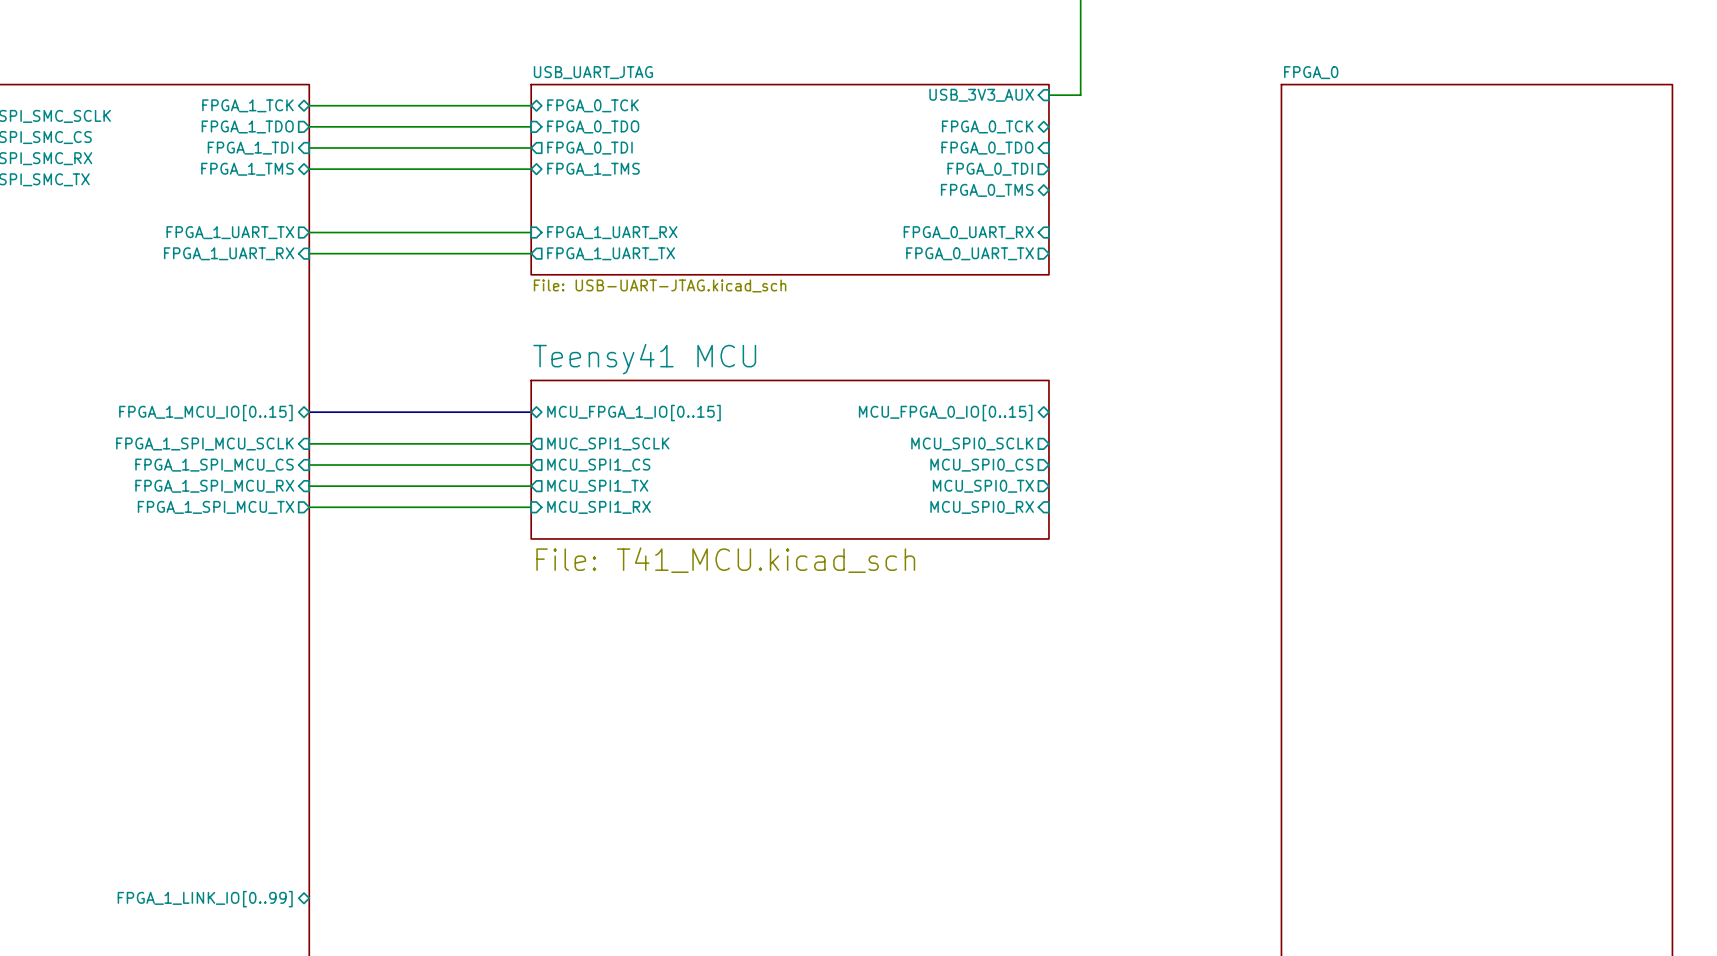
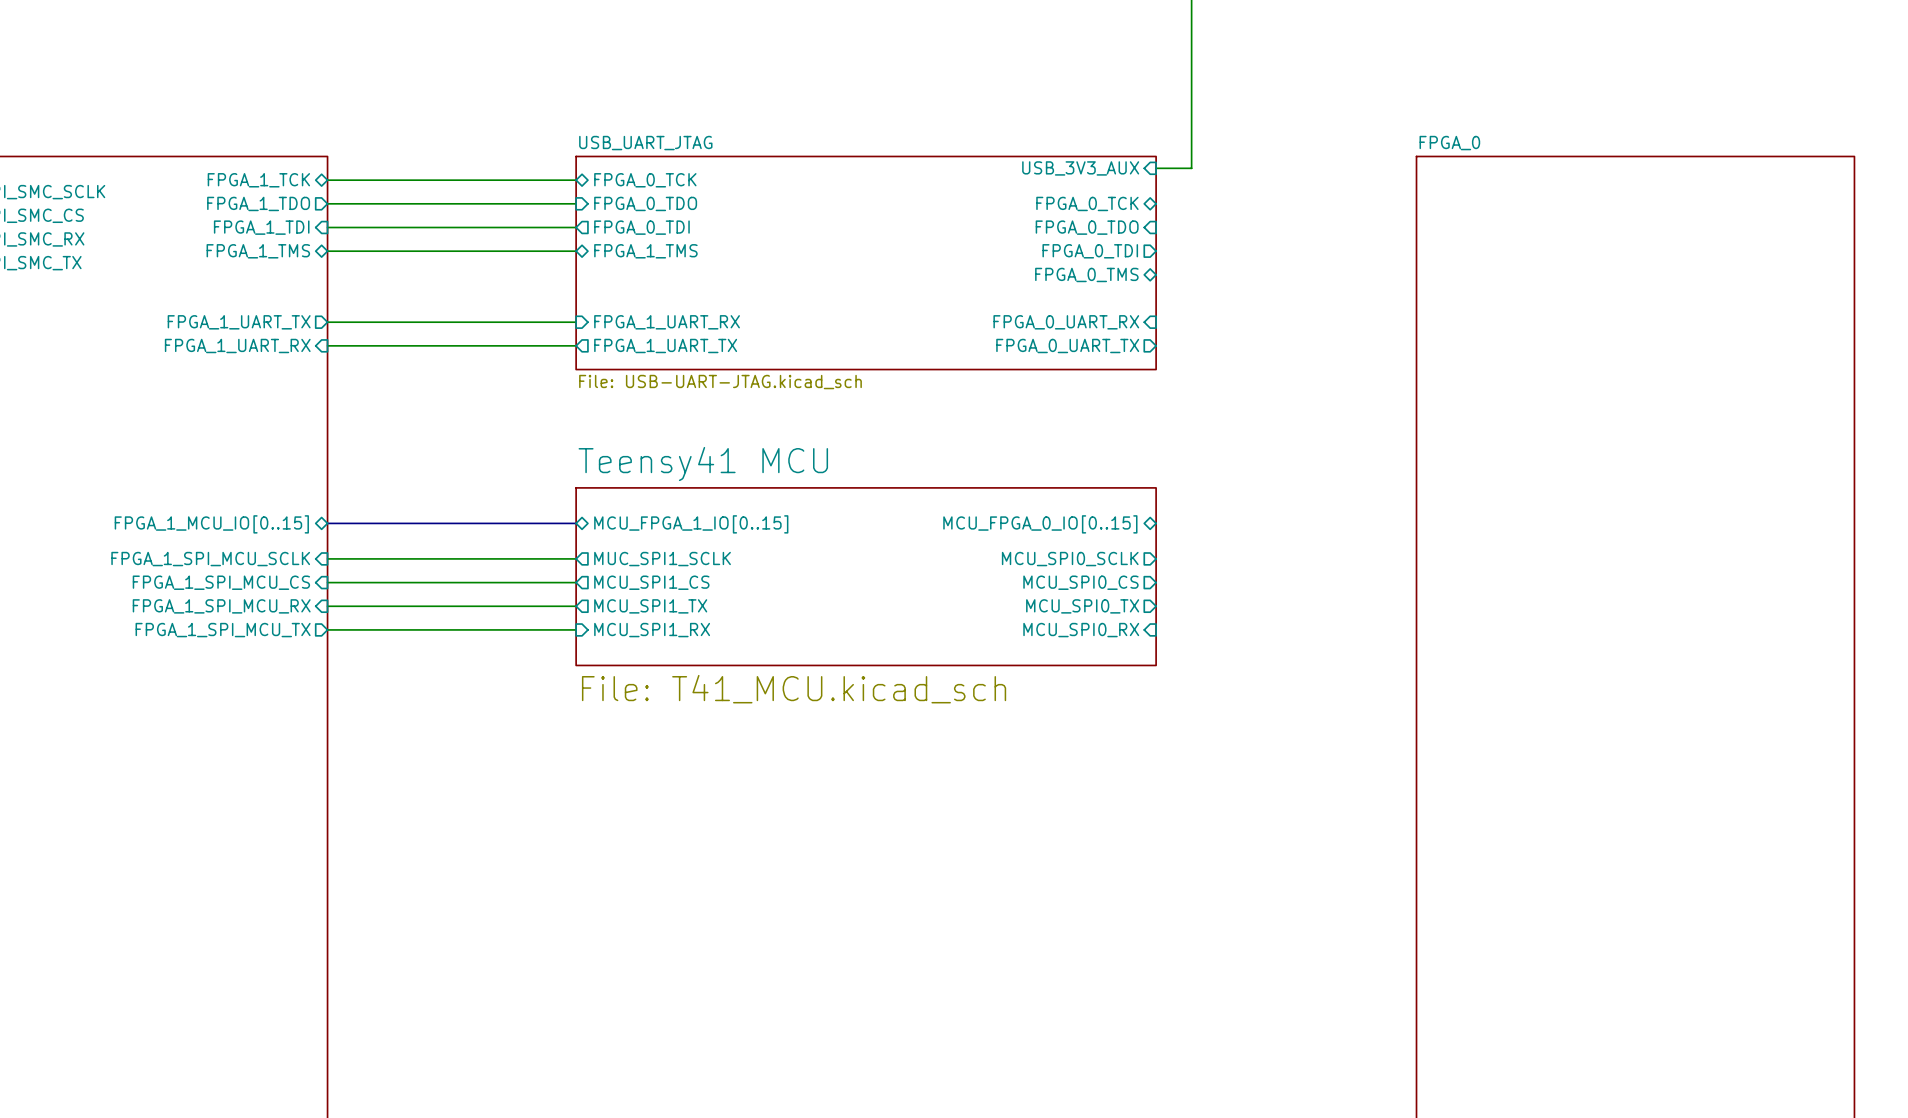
sheet pin: FPGA_1_LINK_IO[0..99] (205, 899) -> none

